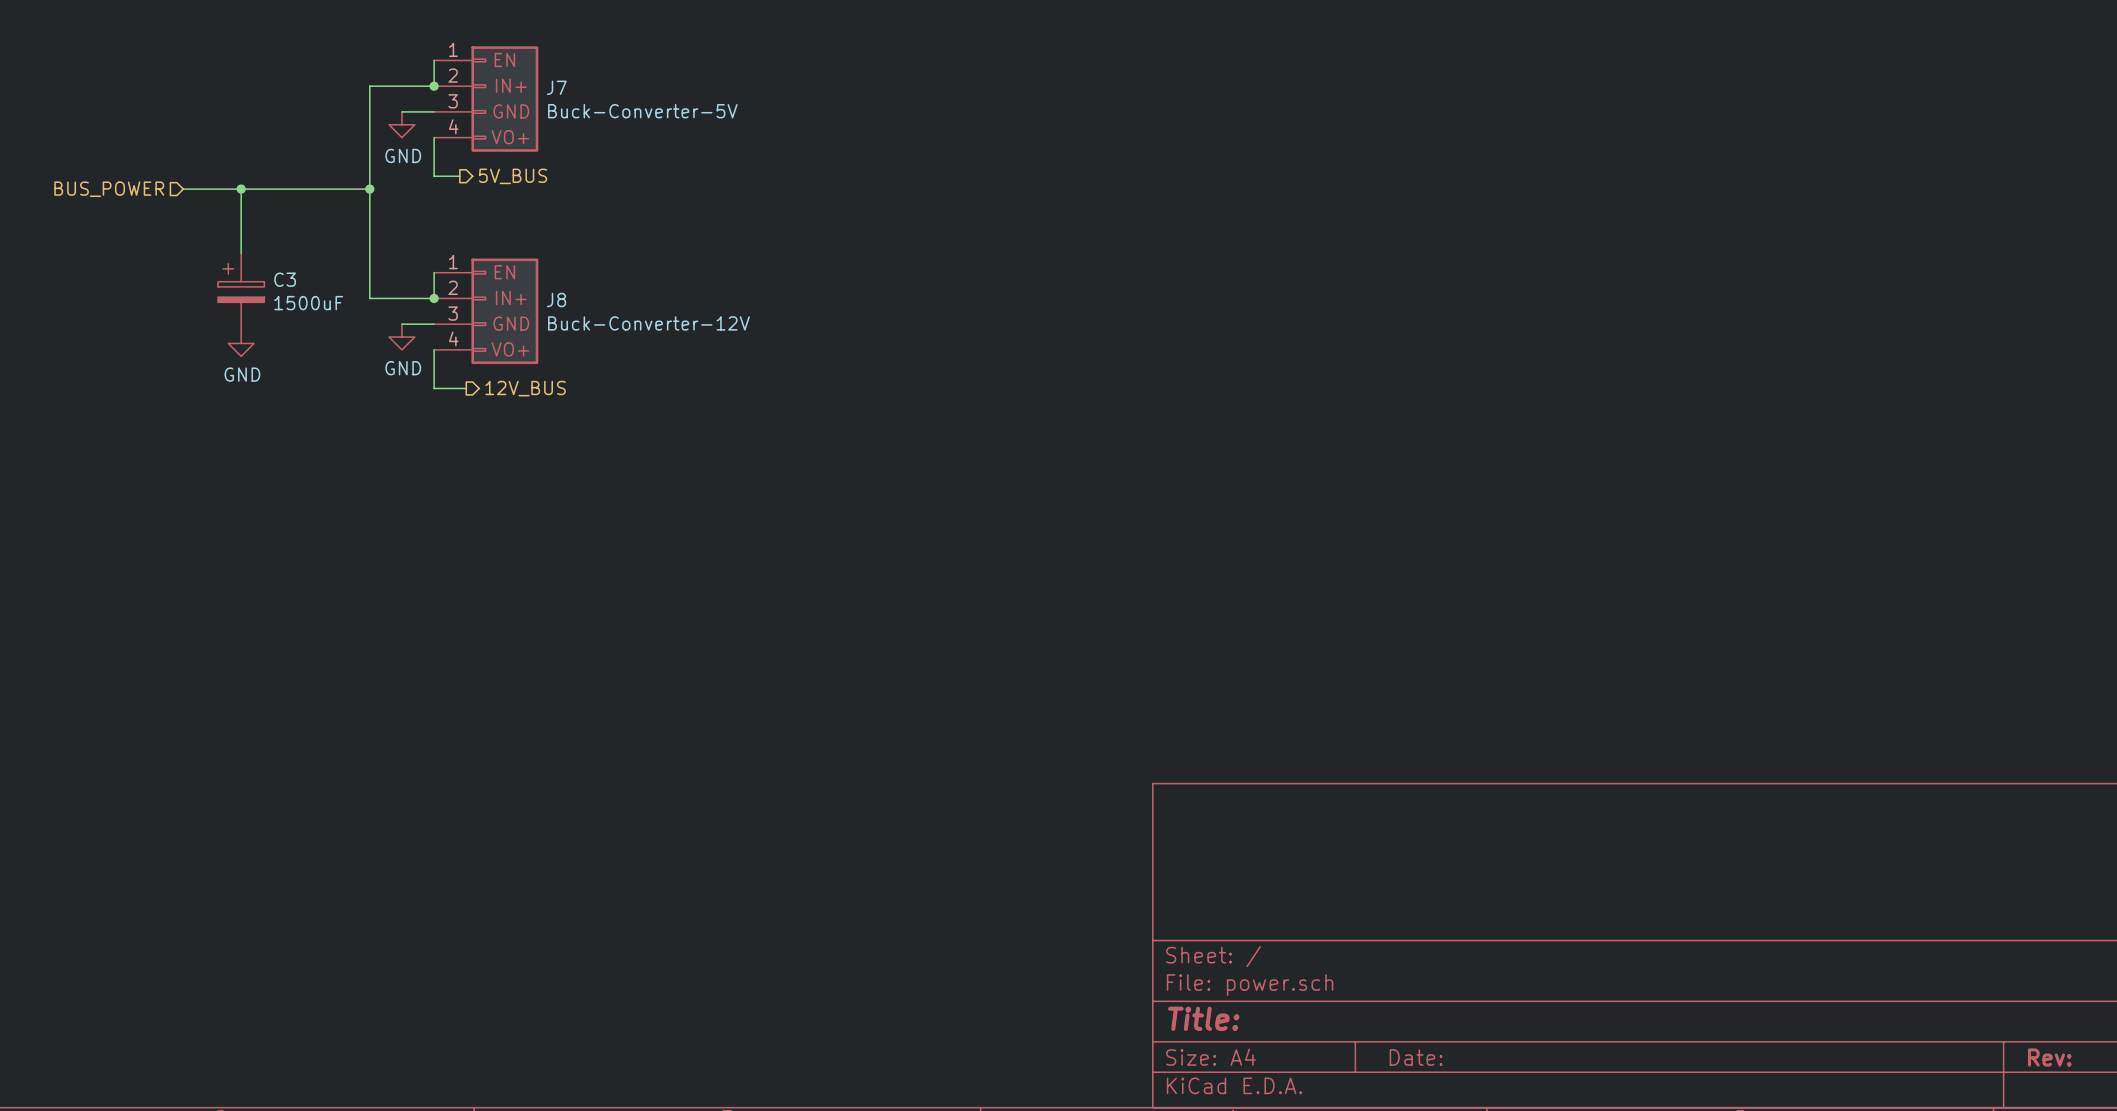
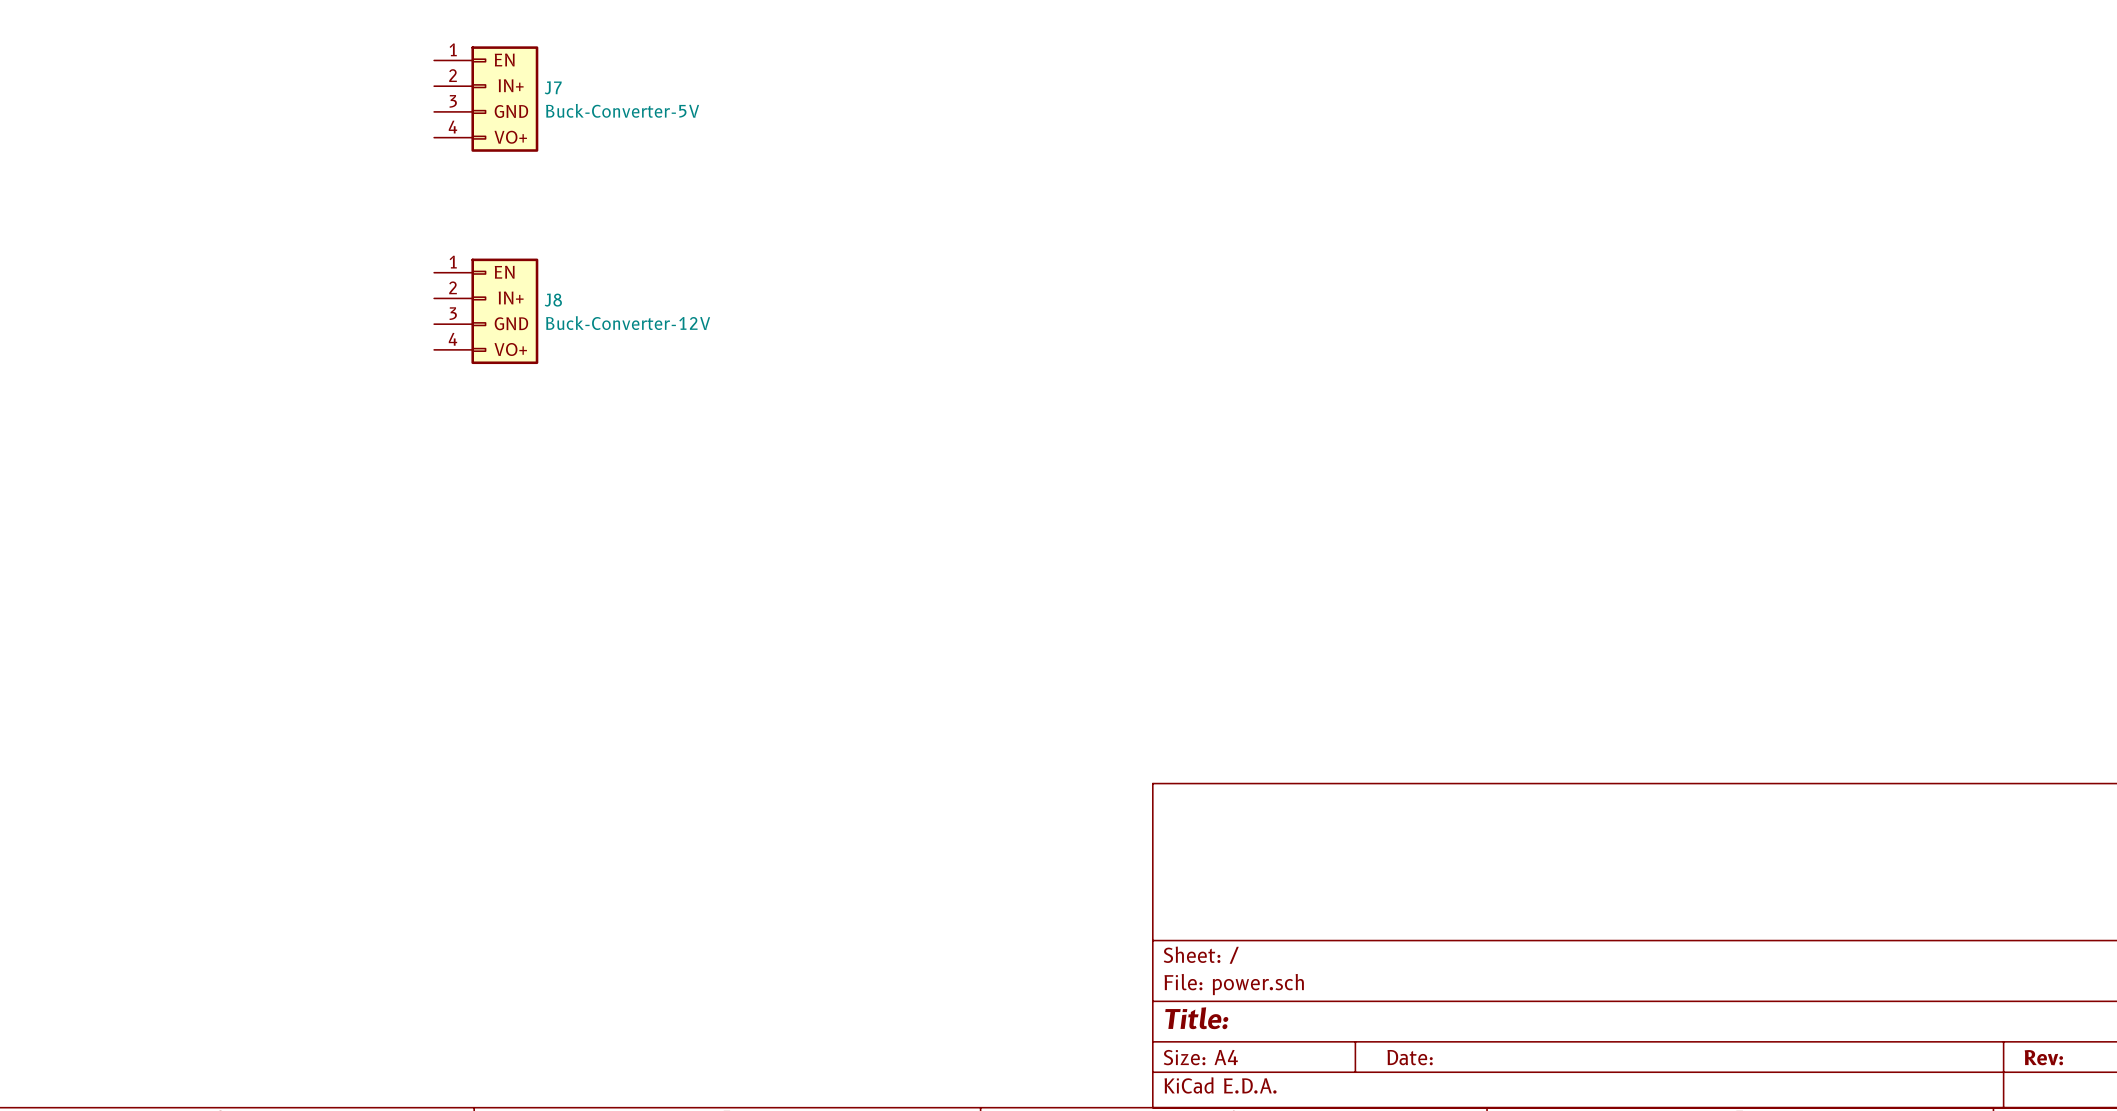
wire: (434, 60) (434, 86) (369, 86) (369, 298) (434, 298) (434, 272) -> none
junction: (434, 86) -> none
wire: (401, 111) (434, 111) -> none
power symbol: GND (401, 124) -> none
wire: (434, 137) (434, 176) (459, 176) -> none
hierarchical label: 5V_BUS (513, 176) -> none
hierarchical label: BUS_POWER (109, 189) -> none
wire: (183, 189) (369, 189) -> none
wire: (241, 189) (241, 253) -> none
junction: (241, 189) -> none
junction: (369, 189) -> none
C3: 1500uF (241, 292) -> none
junction: (434, 298) -> none
wire: (401, 324) (434, 324) -> none
power symbol: GND (401, 337) -> none
power symbol: GND (241, 343) -> none
wire: (434, 349) (434, 388) (466, 388) -> none
hierarchical label: 12V_BUS (525, 388) -> none

